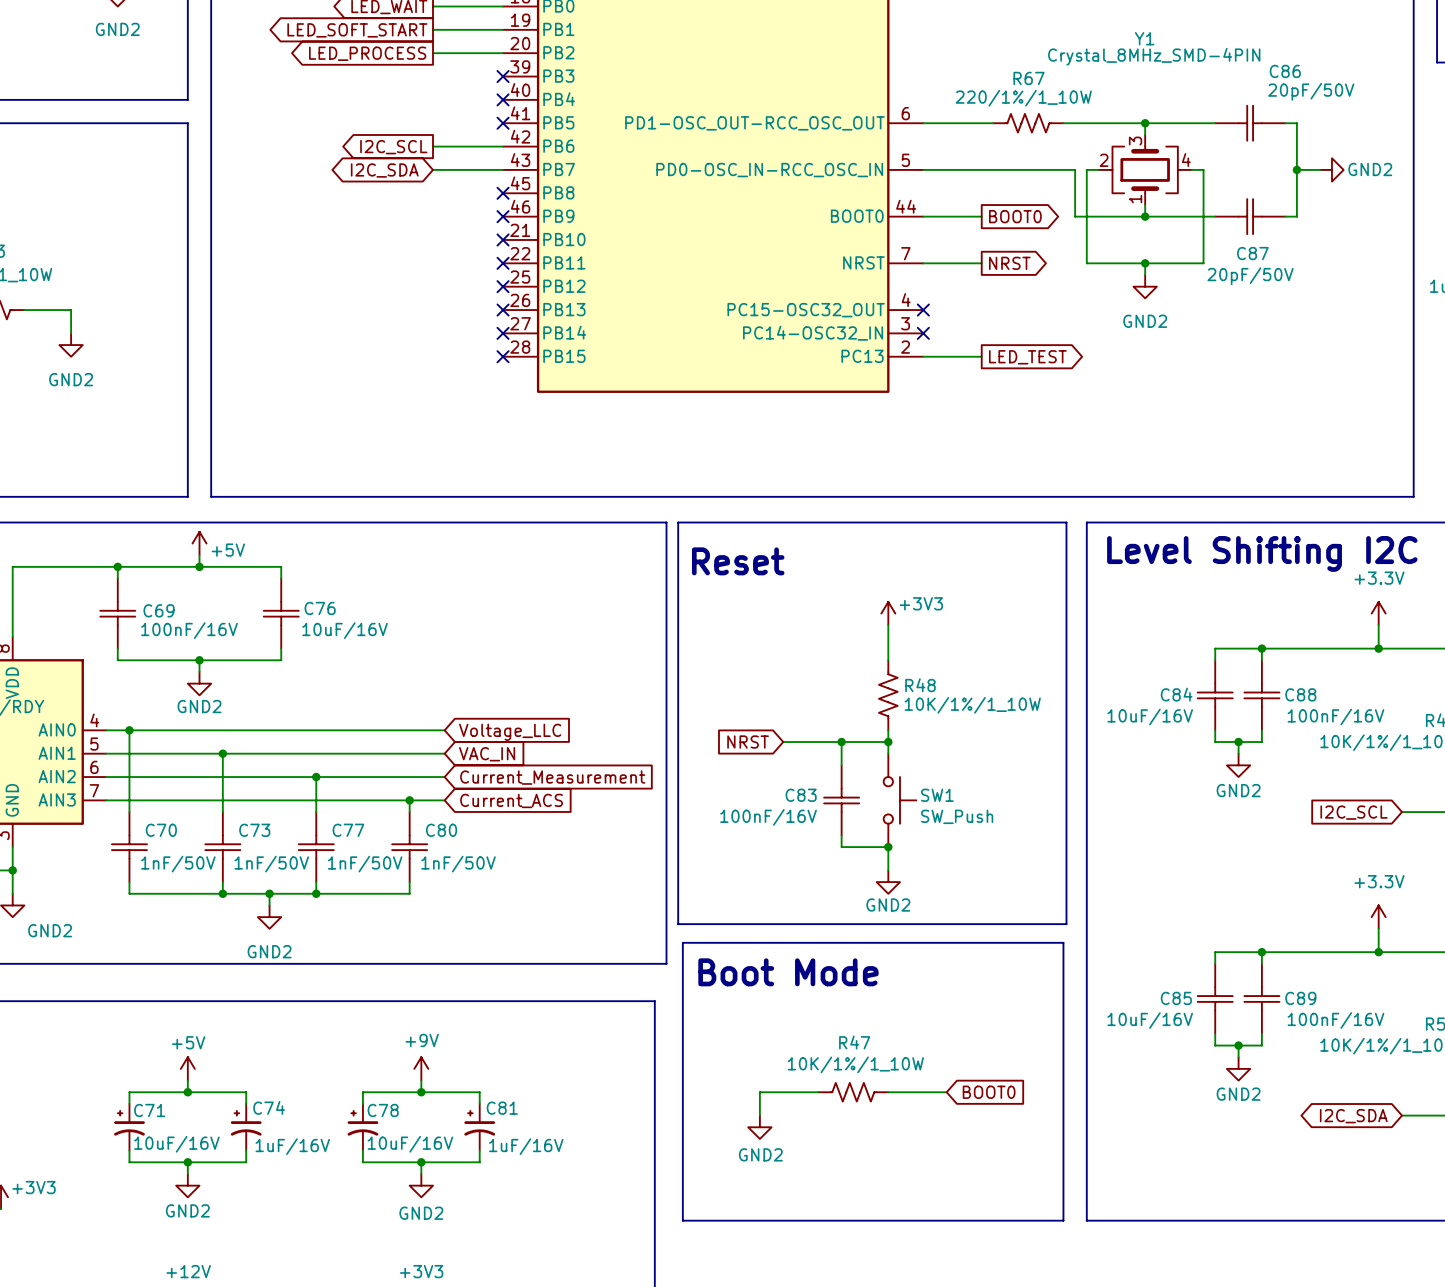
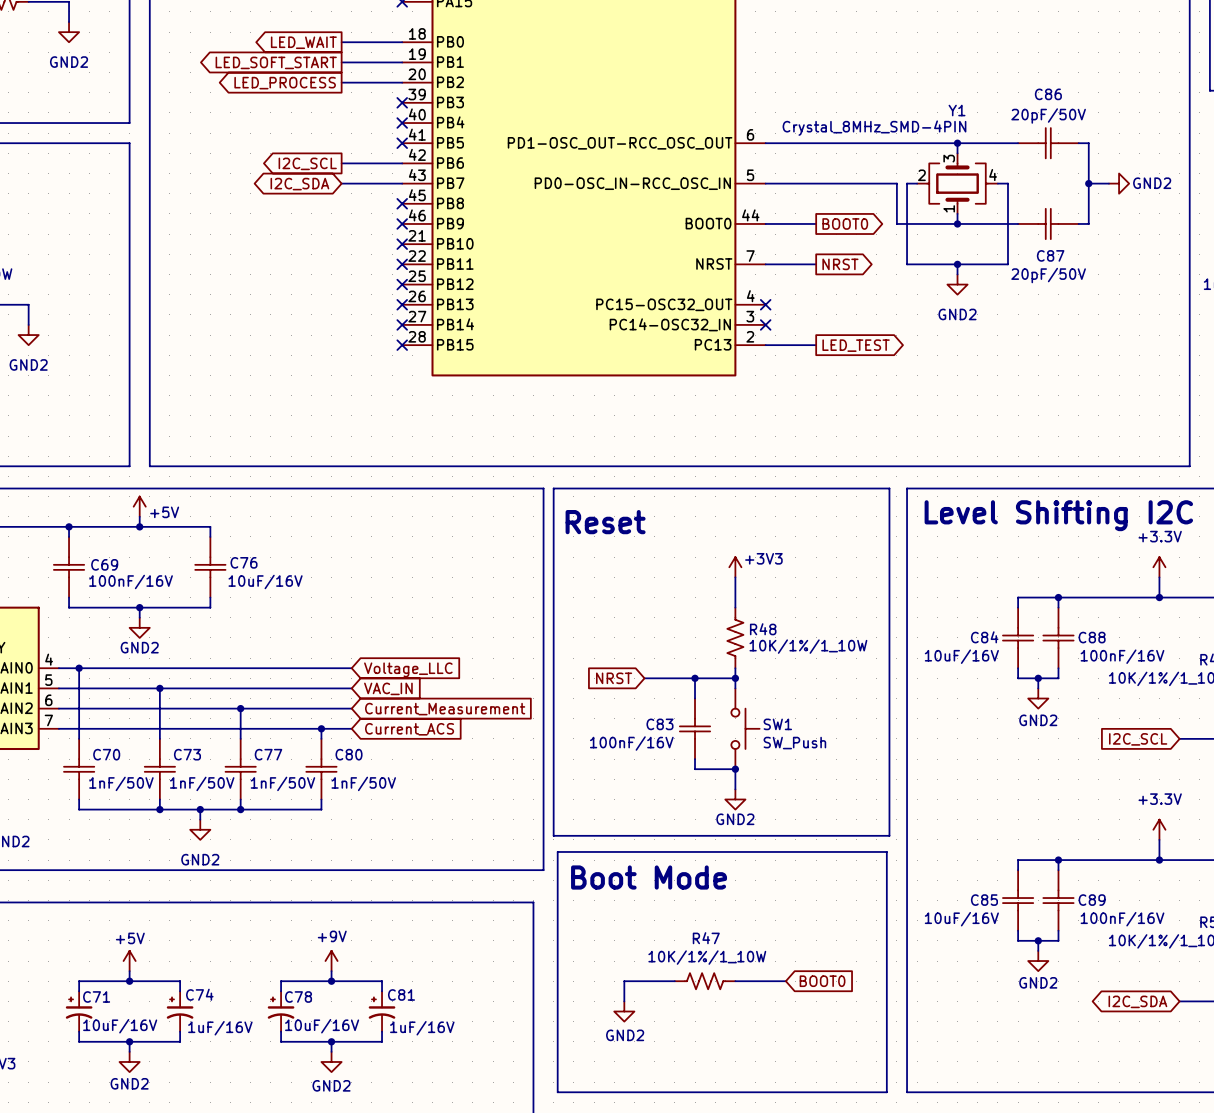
Y1 name position: Y1 (1144, 38) -> Y1 (957, 110)
Y1 value position: Crystal_8MHz_SMD-4PIN (1154, 56) -> Crystal_8MHz_SMD-4PIN (874, 128)
C86 name position: C86 (1285, 71) -> C86 (1048, 94)
C86 value position: 20pF/50V (1311, 91) -> 20pF/50V (1048, 116)
R67: 220/1%/1_10W (1028, 123) -> none

